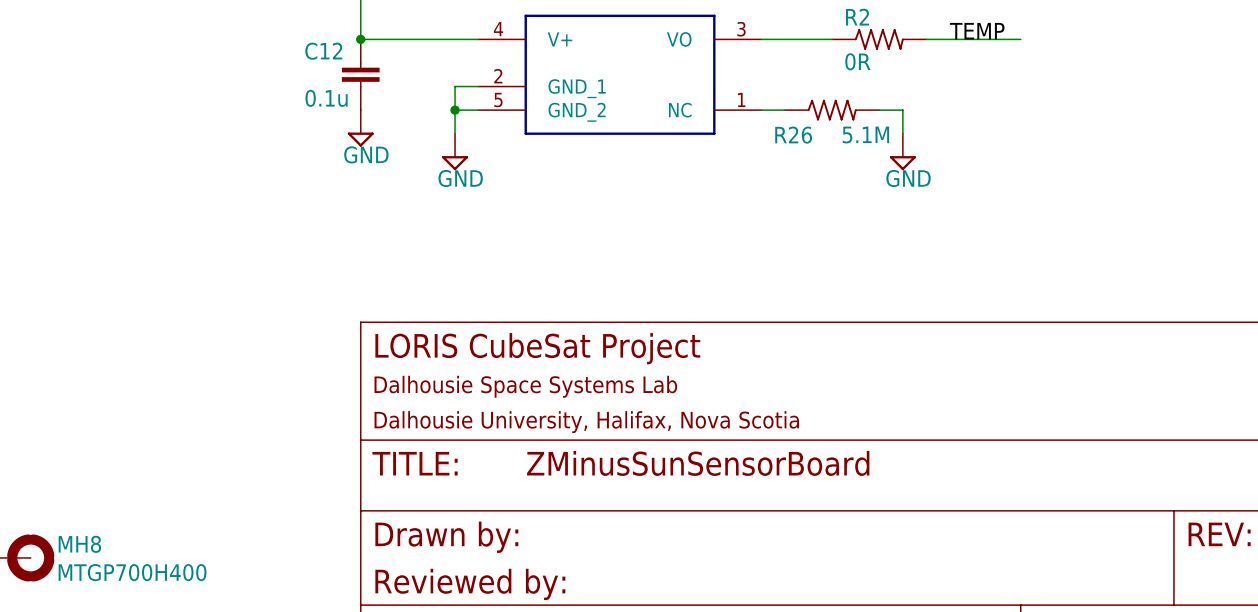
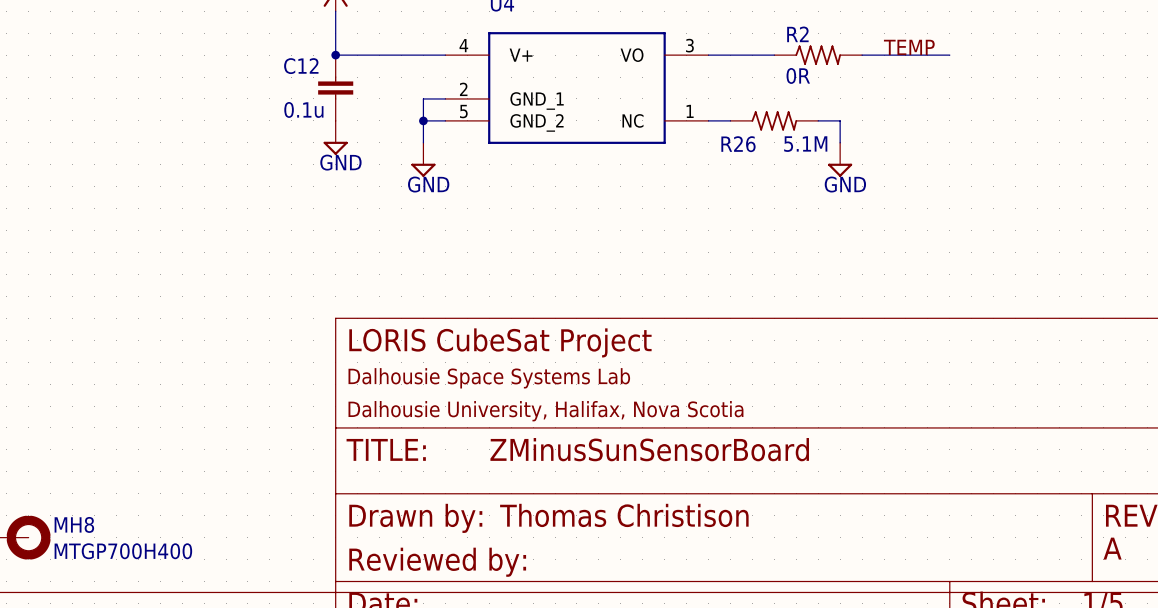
text: none -> Thomas Christison (624, 515)
text: none -> A (1112, 548)

